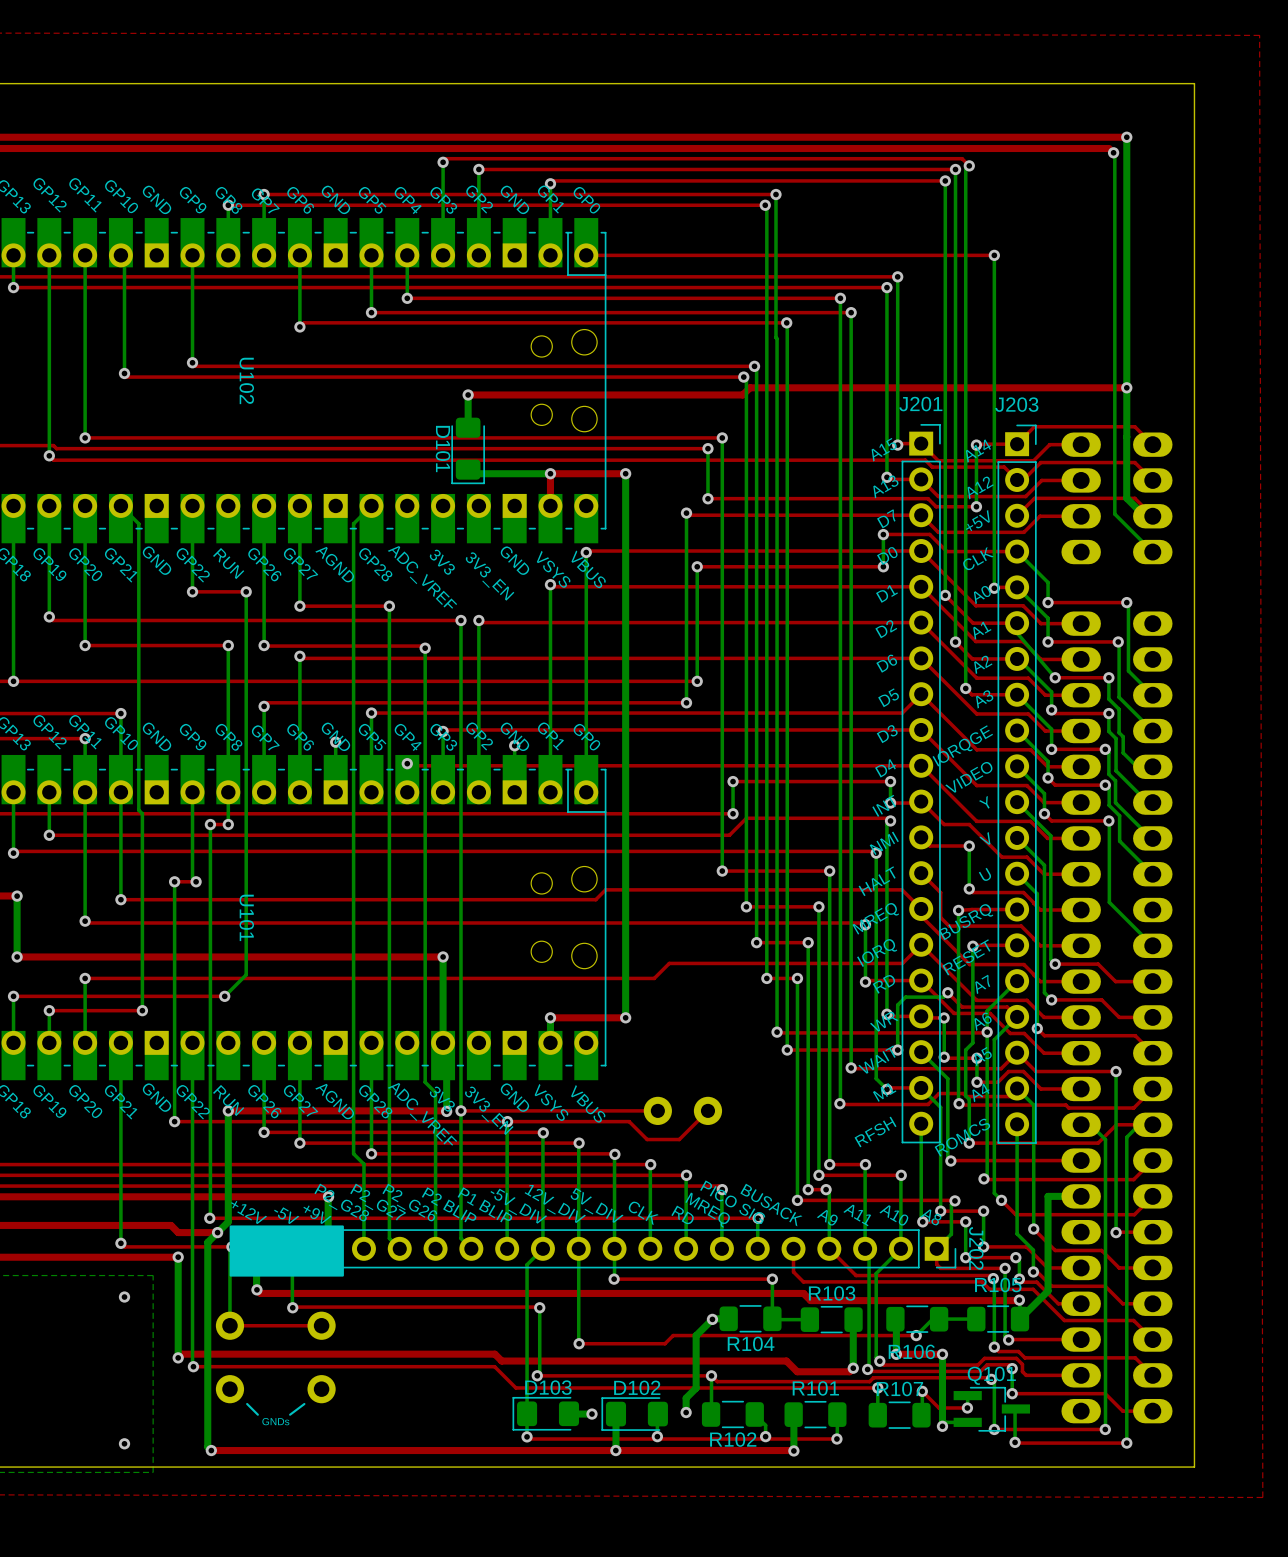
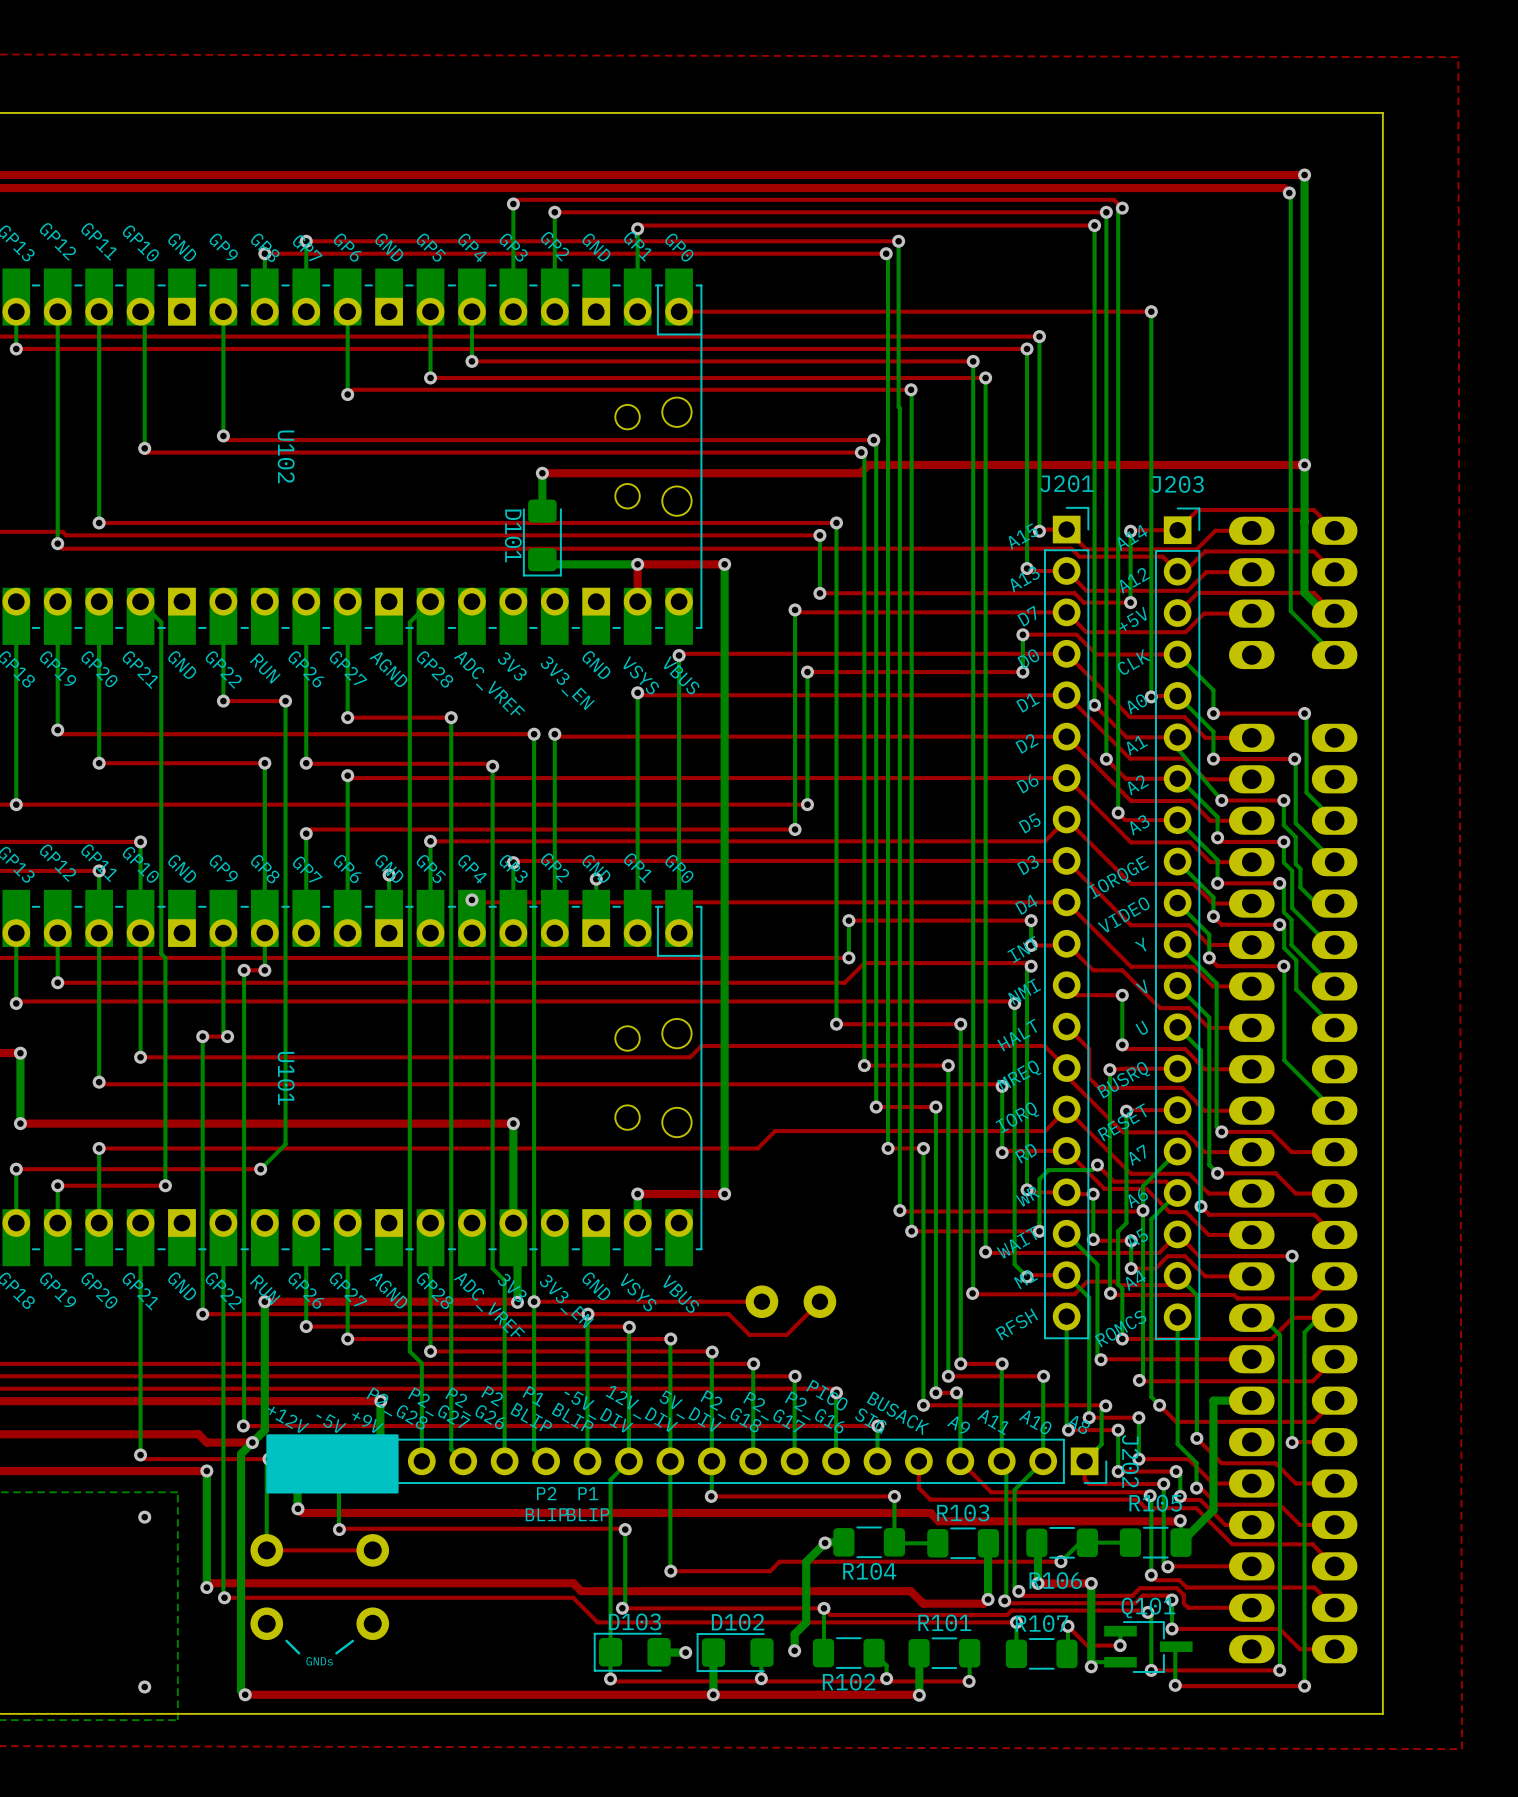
text: MREQ (707, 1210) -> P2_G16 (815, 1412)
text: CLK (643, 1213) -> P2_G18 (731, 1411)
text: RD (682, 1214) -> P2_G17 (774, 1411)
text: none -> P2 (546, 1493)
text: none -> P1 (588, 1493)
text: none -> BLIP (546, 1514)
text: none -> BLIP (588, 1514)

